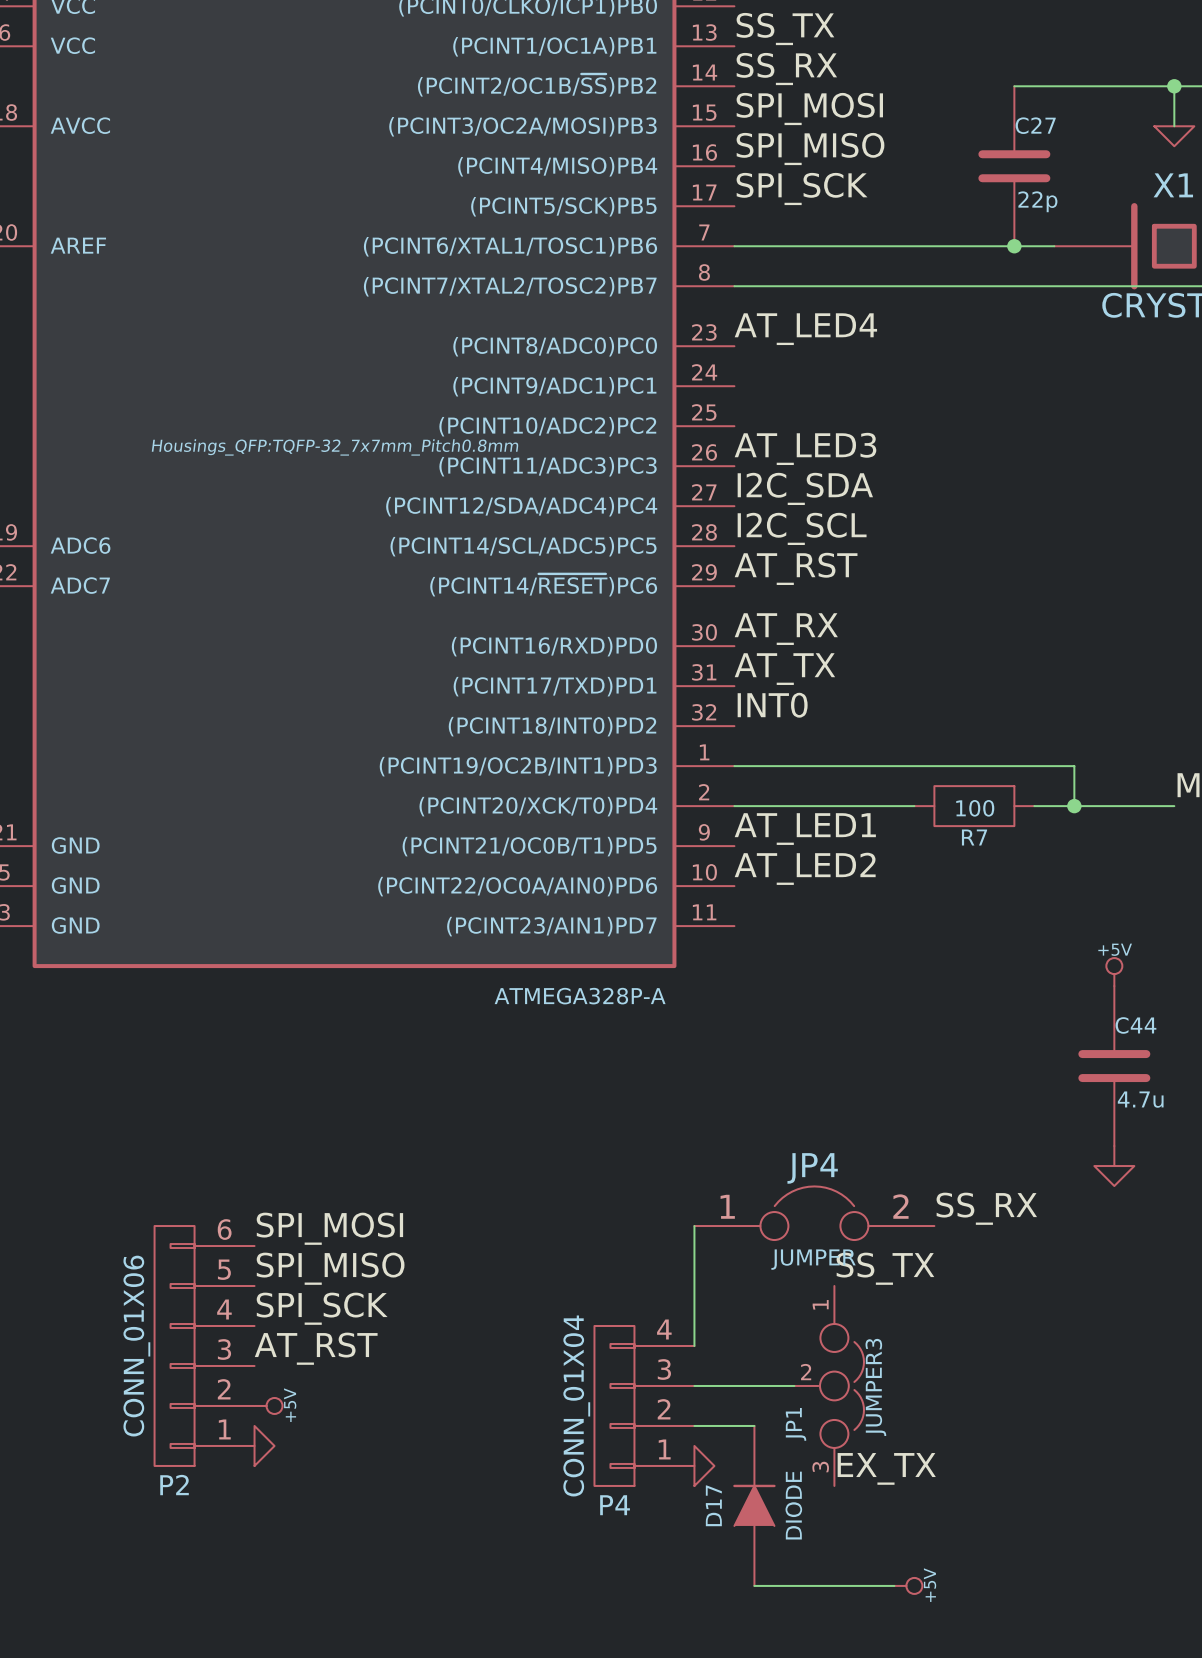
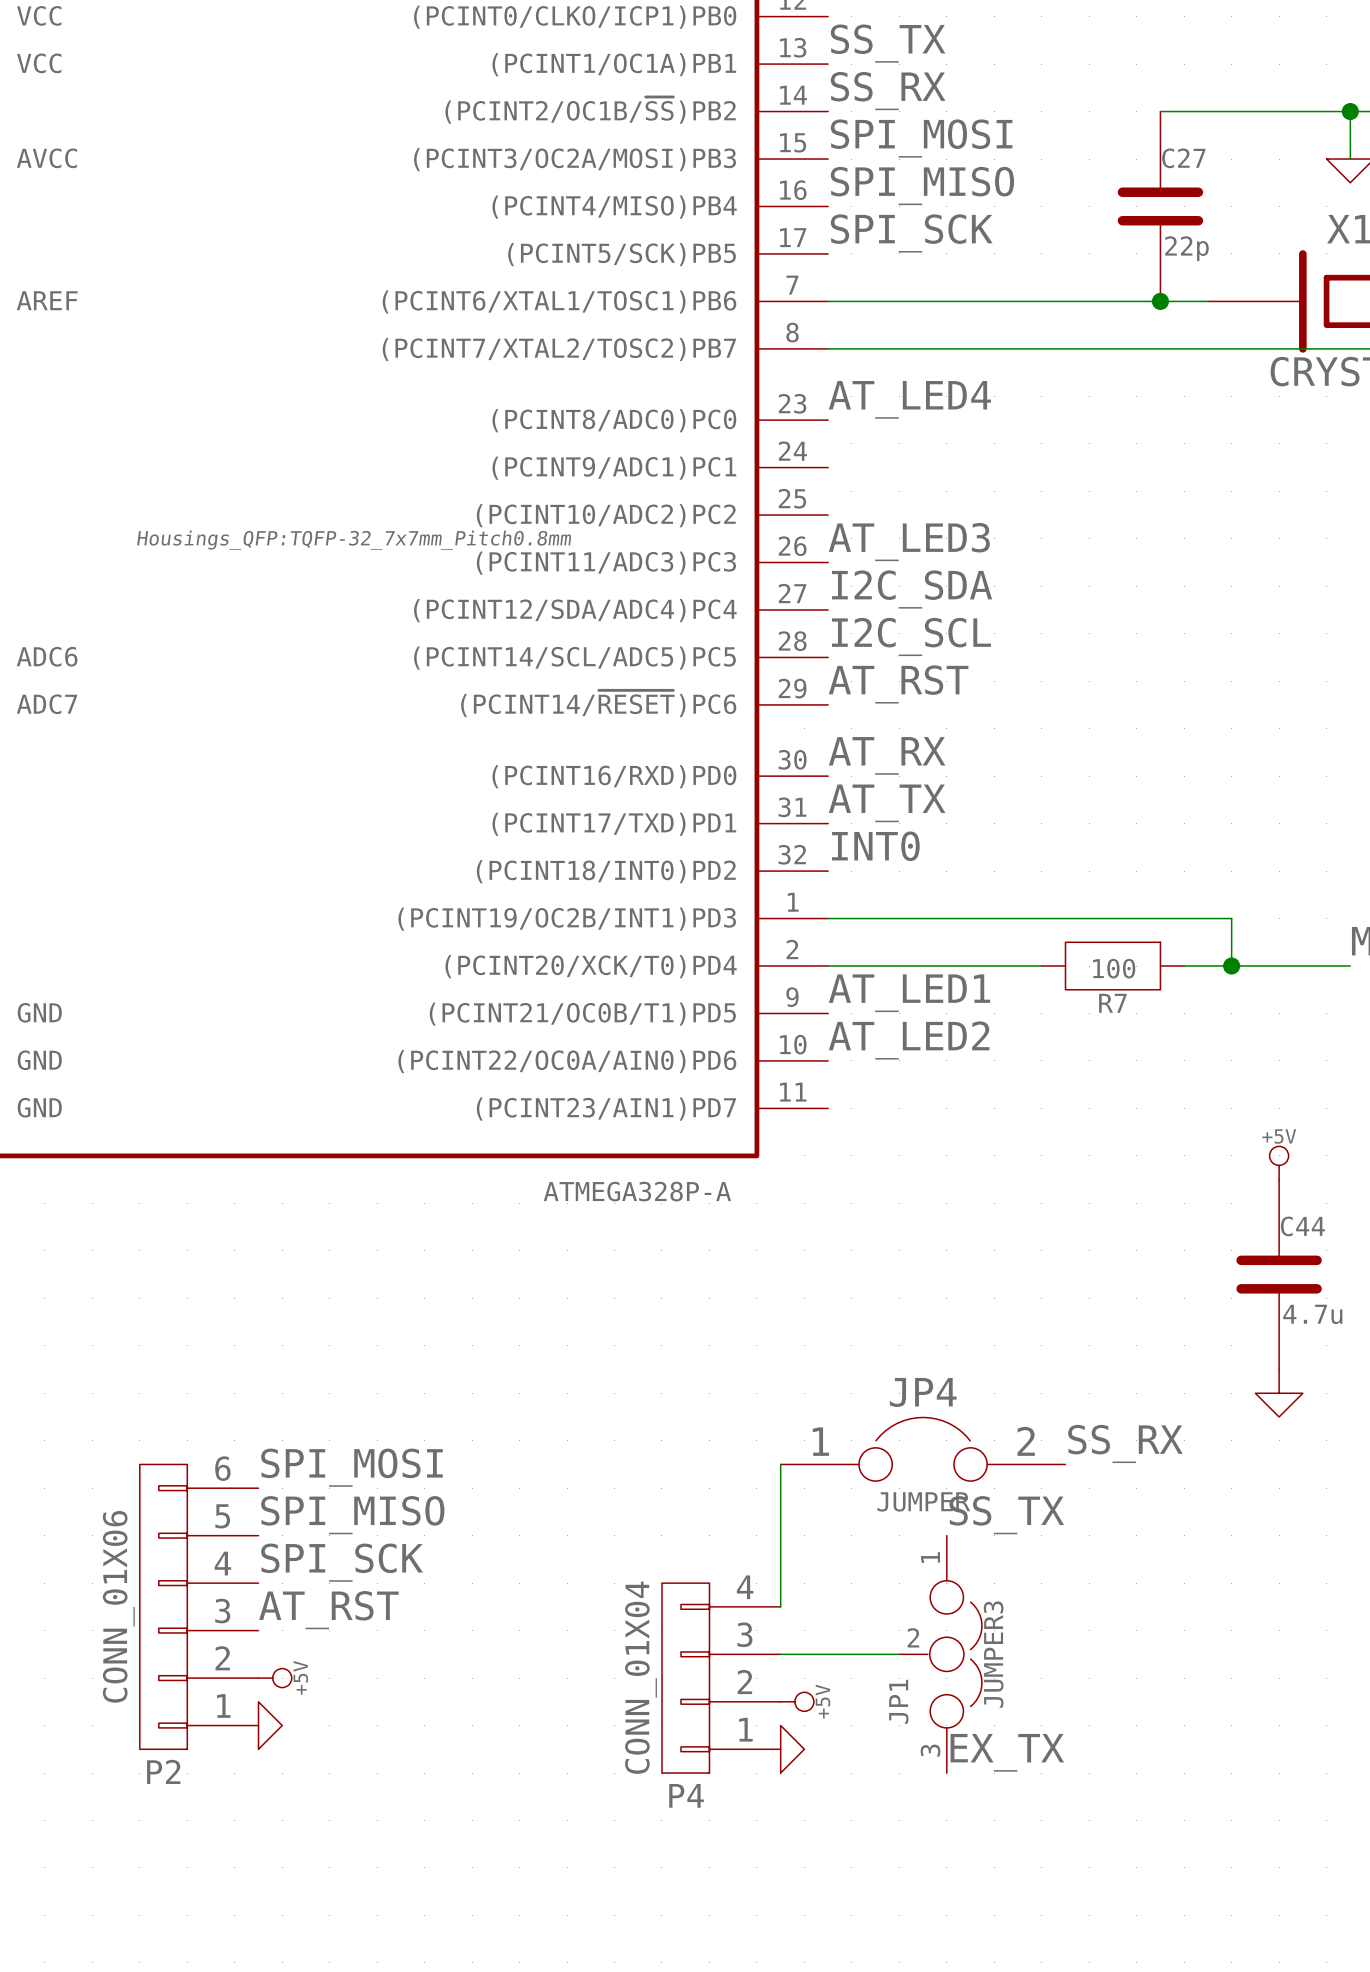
wire: (694, 1425) (754, 1425) -> none
D17: DIODE (754, 1505) -> none
wire: (754, 1585) (894, 1585) -> none
power symbol position: +5V (908, 1585) -> +5V (797, 1701)

